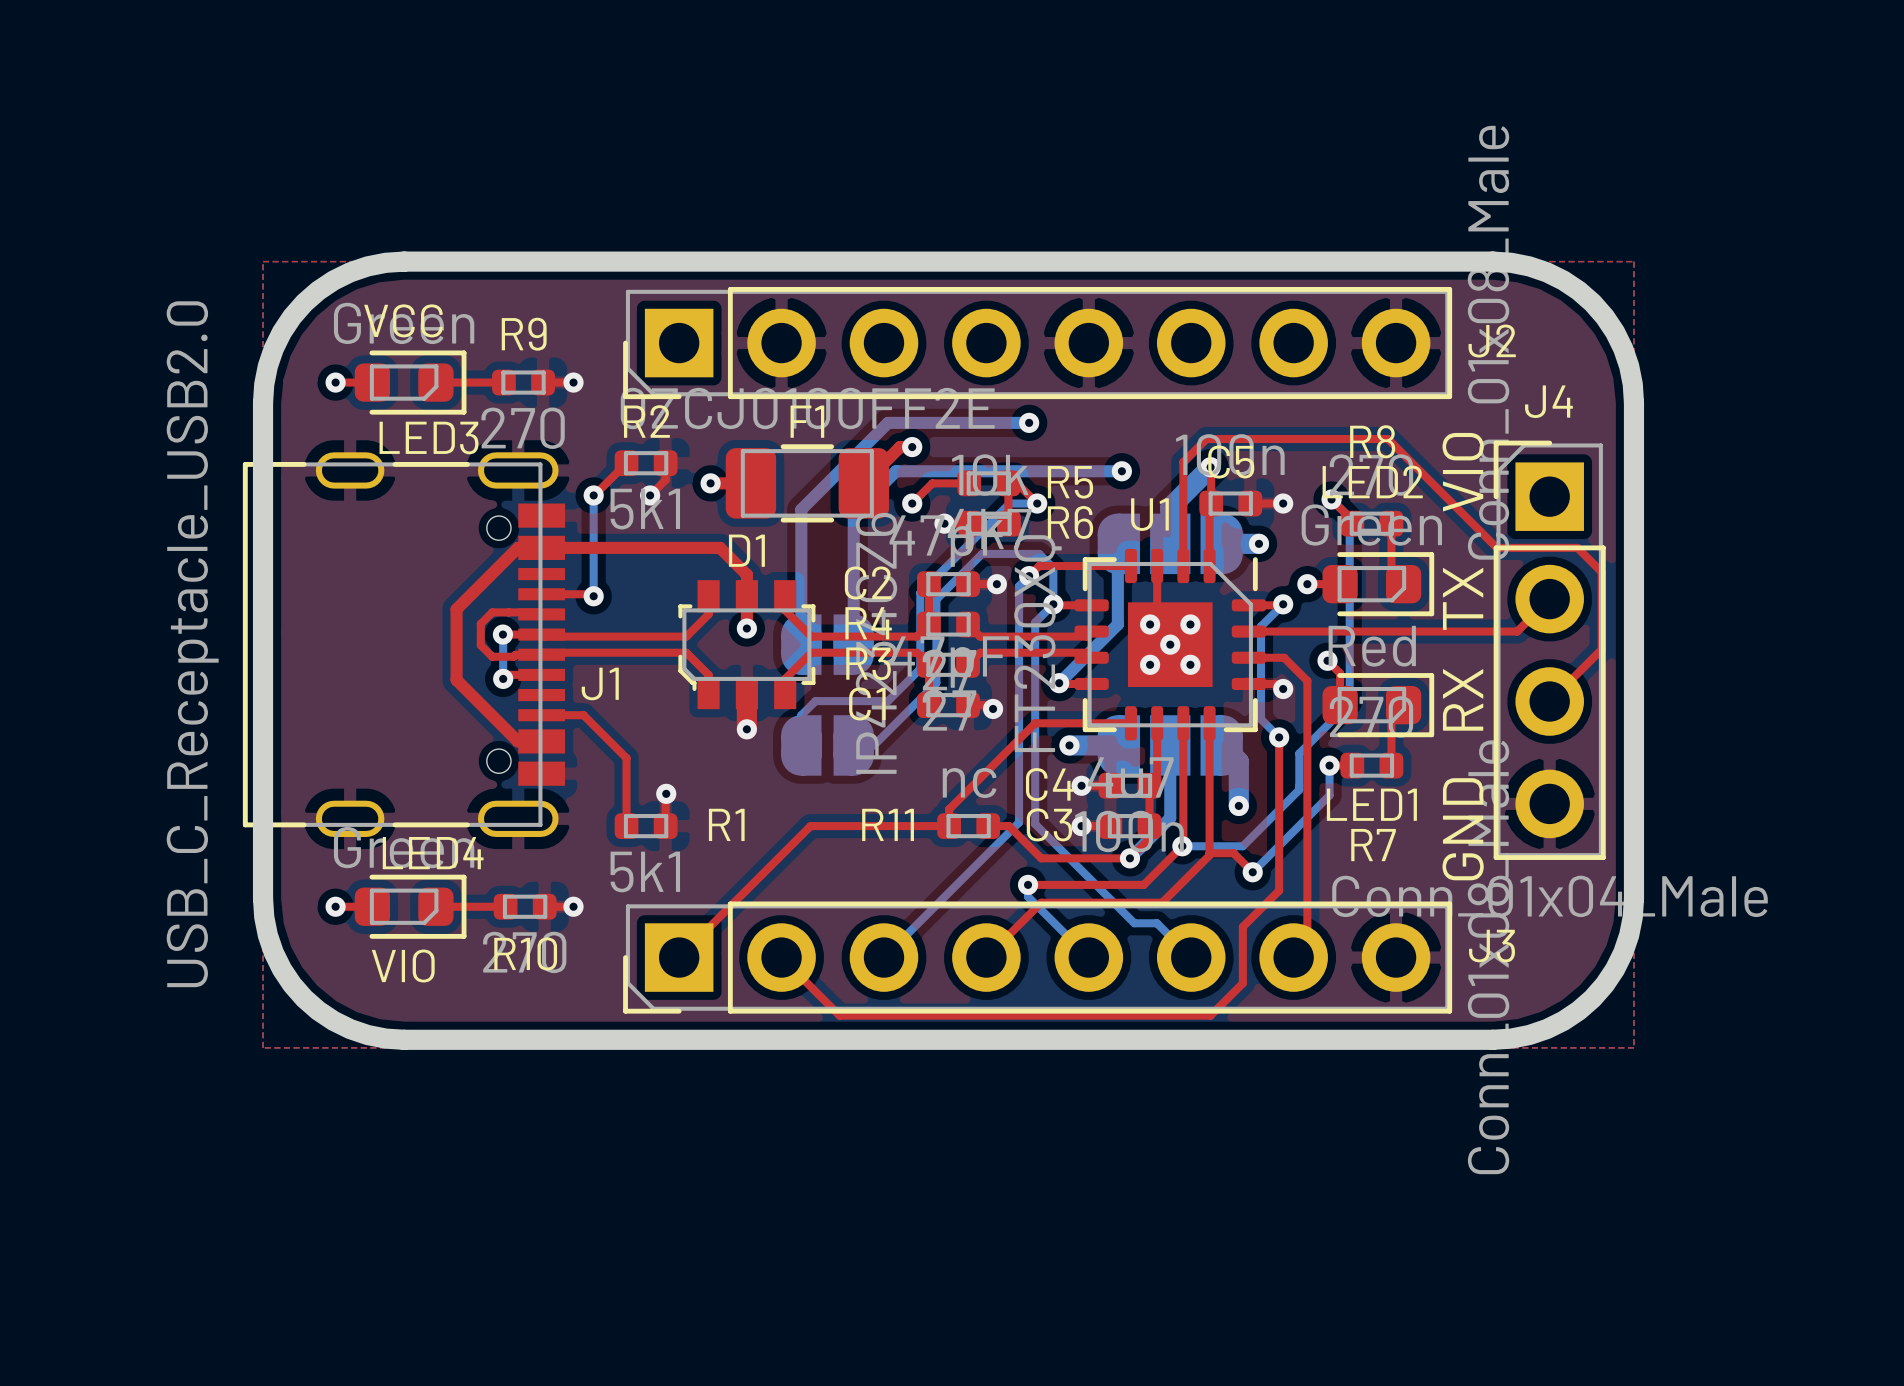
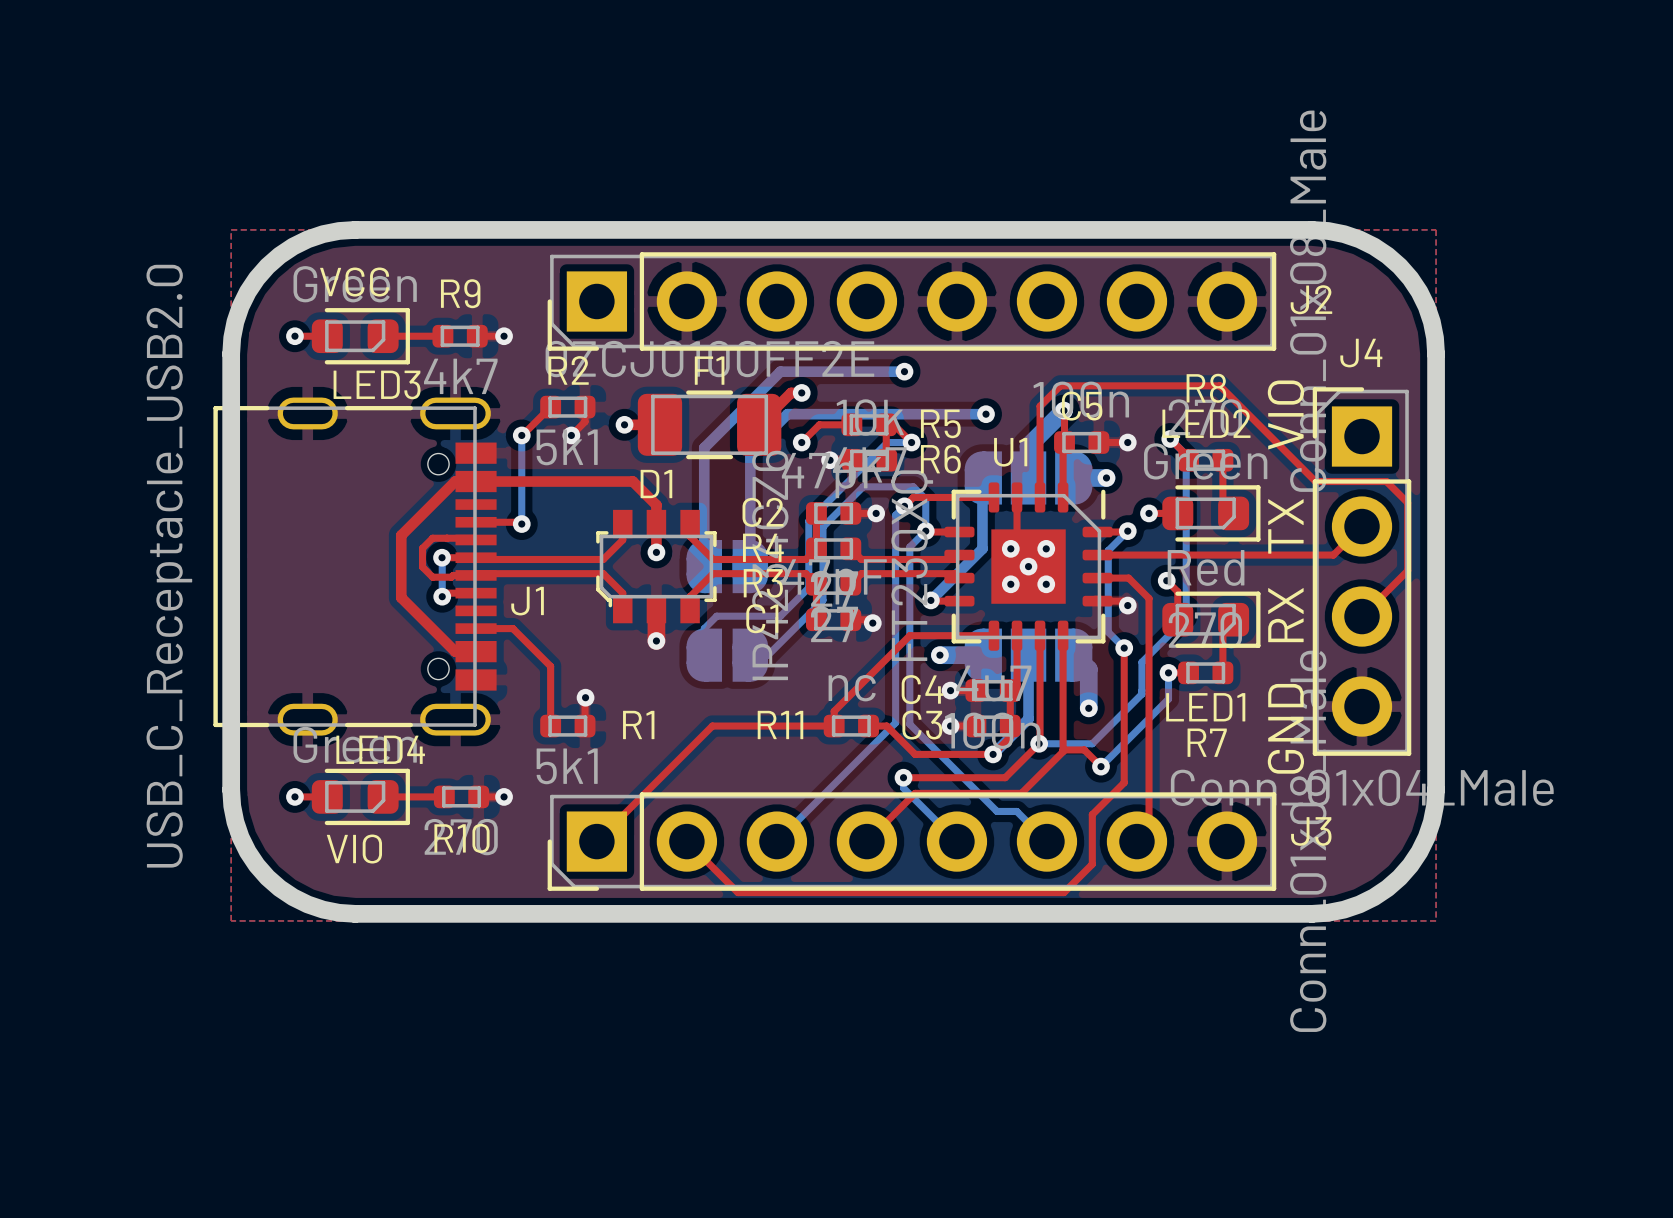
R9 value: 270 (523, 428) -> 4k7 (460, 376)

